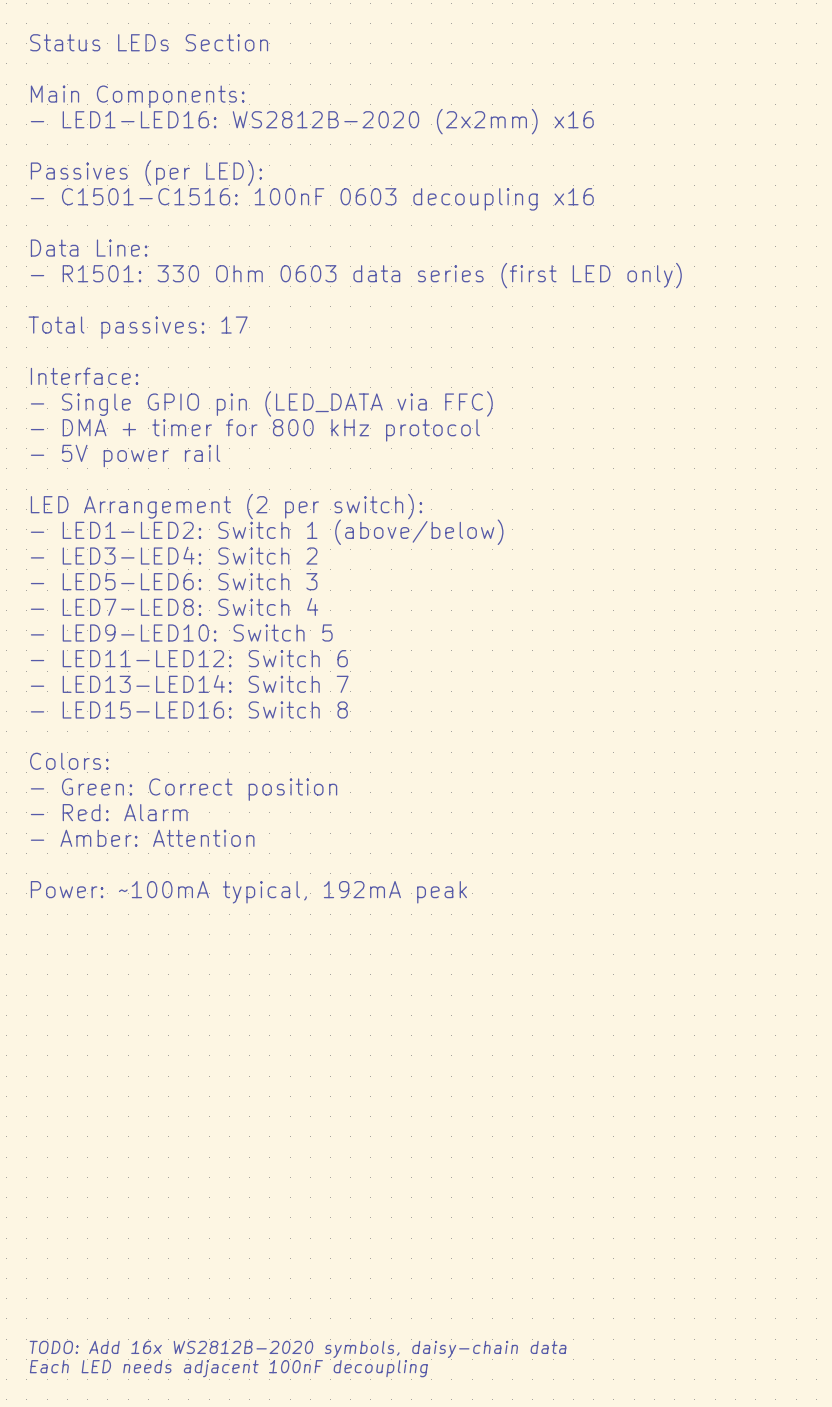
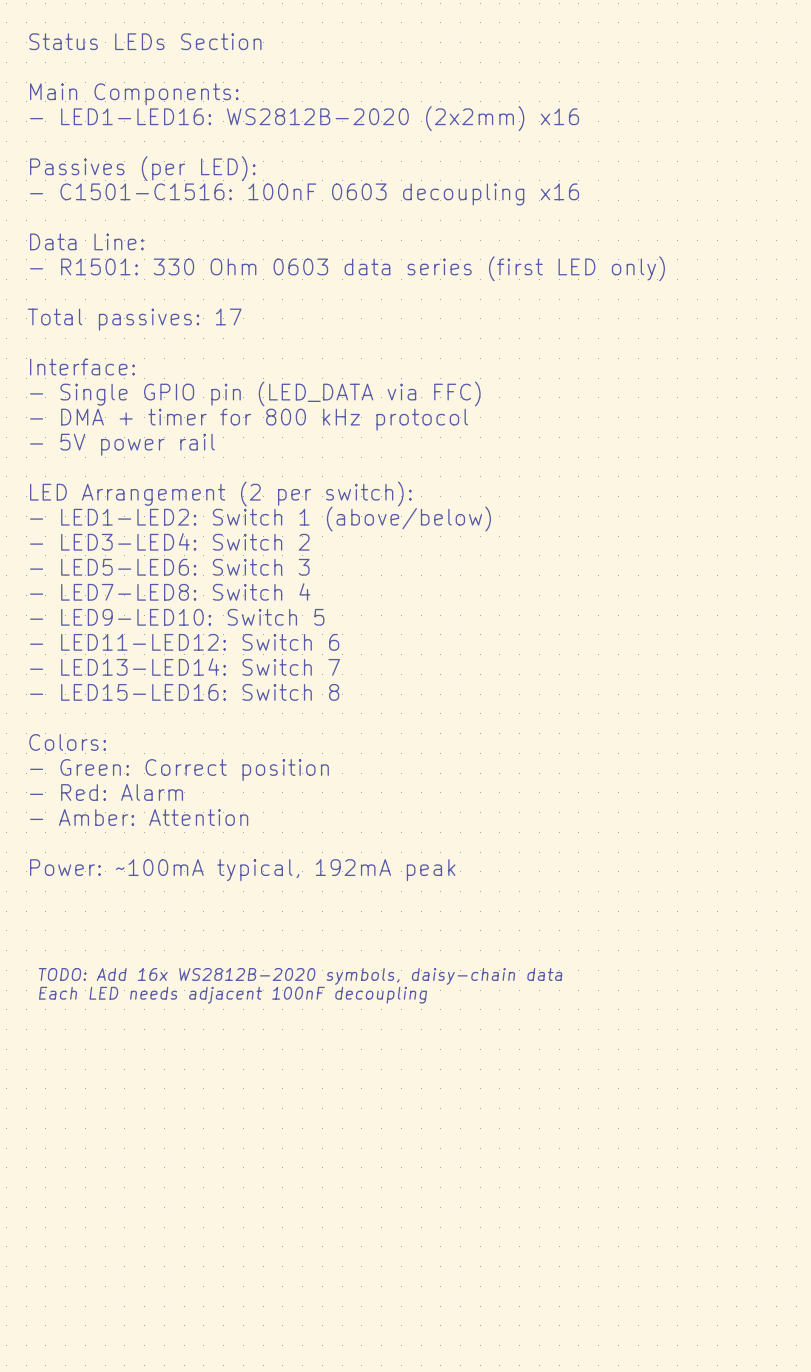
text: none -> TODO: Add 16x WS2812B-2020 symbols, daisy-chain data (300, 976)
text: none -> Each LED needs adjacent 100nF decoupling (233, 995)
text: TODO: Add 16x WS2812B-2020 symbols, daisy-chain data (298, 1349) -> none
text: Each LED needs adjacent 100nF decoupling (228, 1368) -> none

